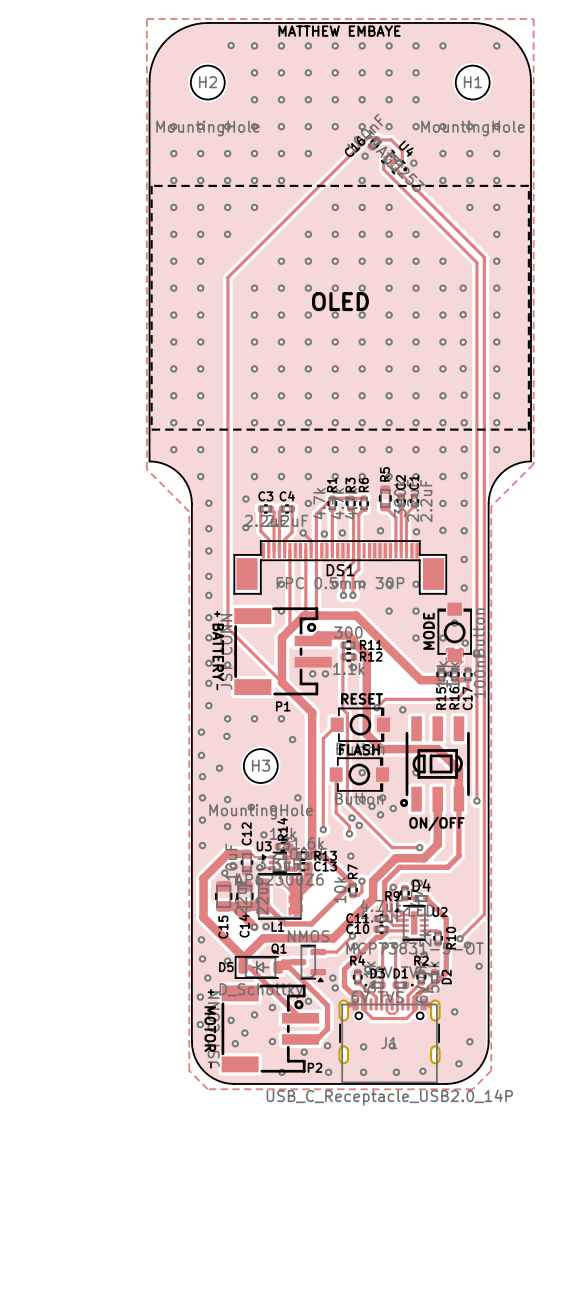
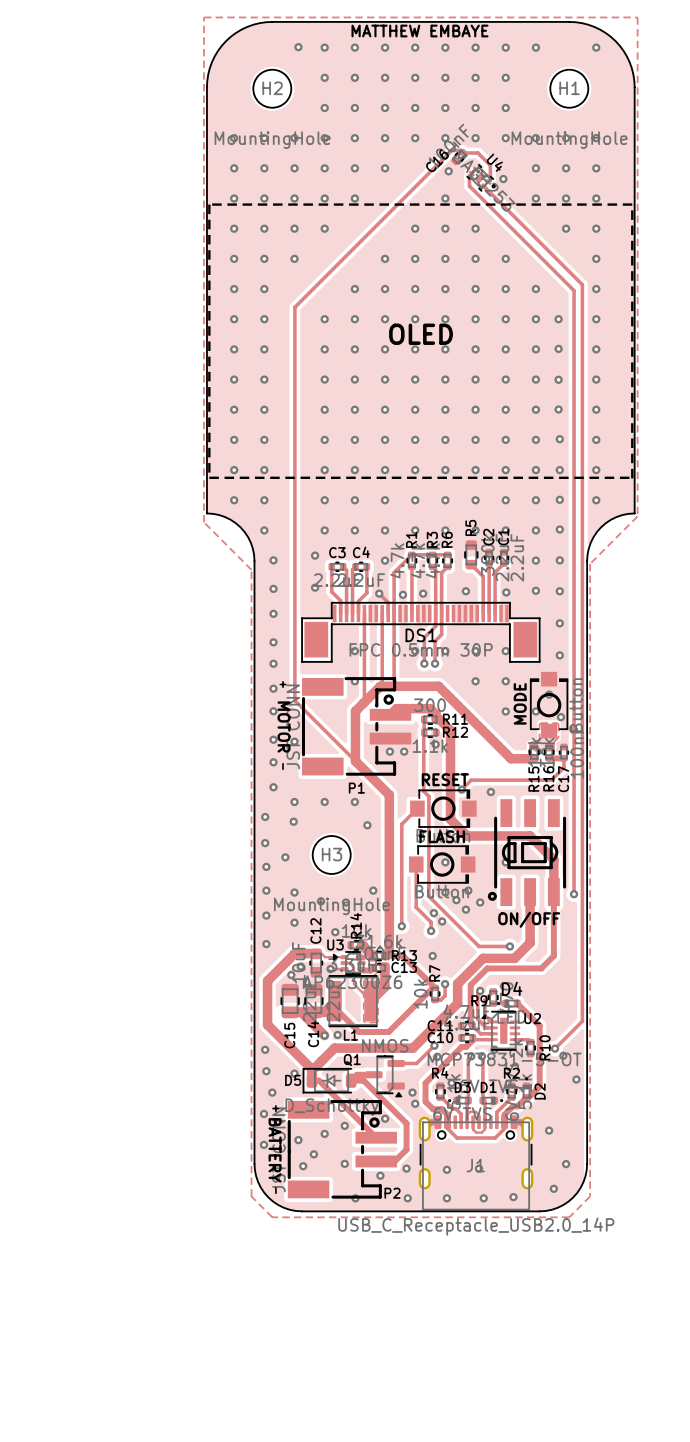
text: BATTERY (218, 652) -> MOTOR (284, 727)
text: MOTOR (210, 1029) -> BATTERY (275, 1150)

